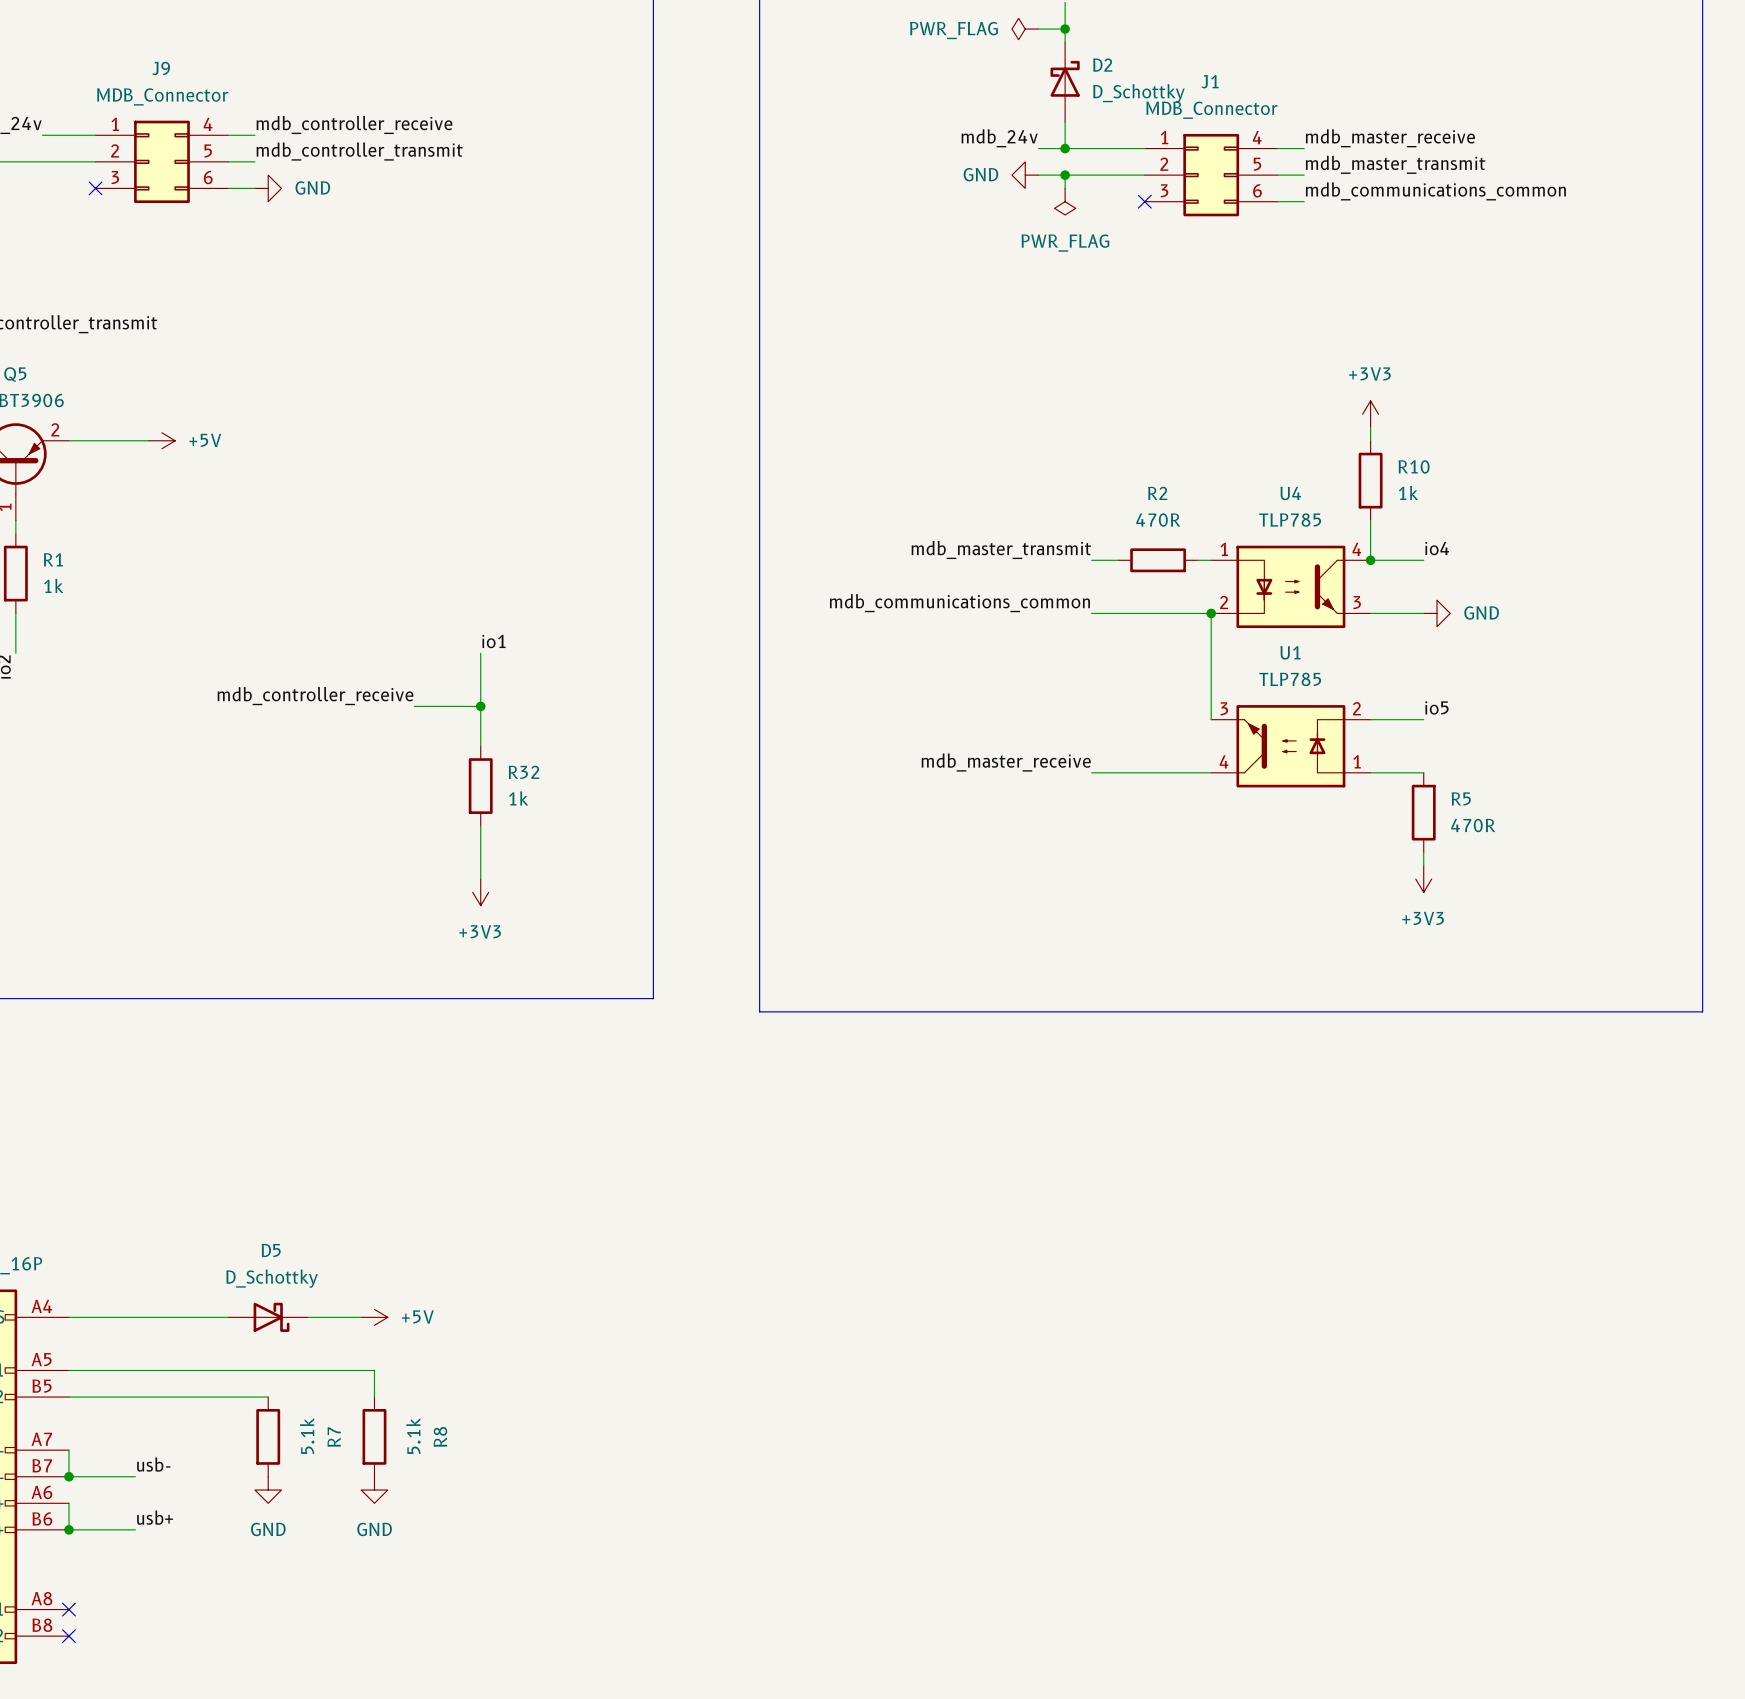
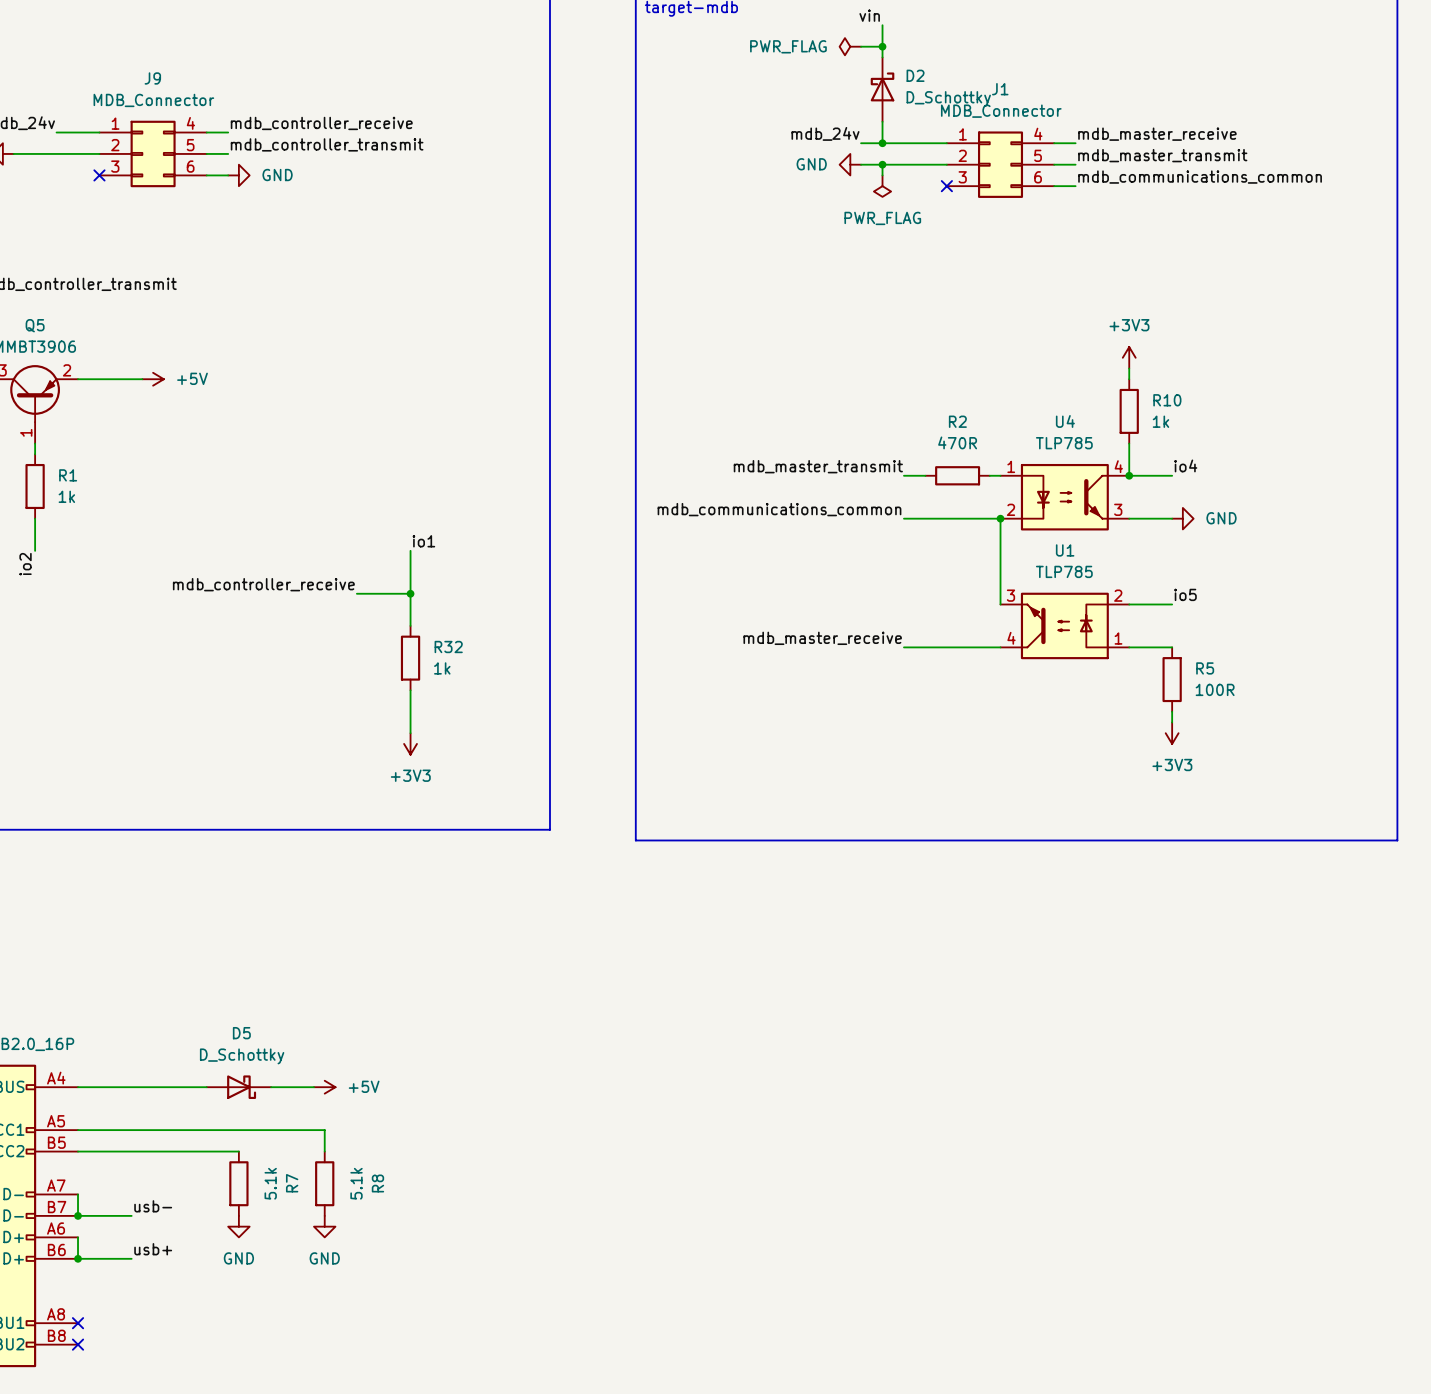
R5 value: 470R (1473, 825) -> 100R (1215, 689)

